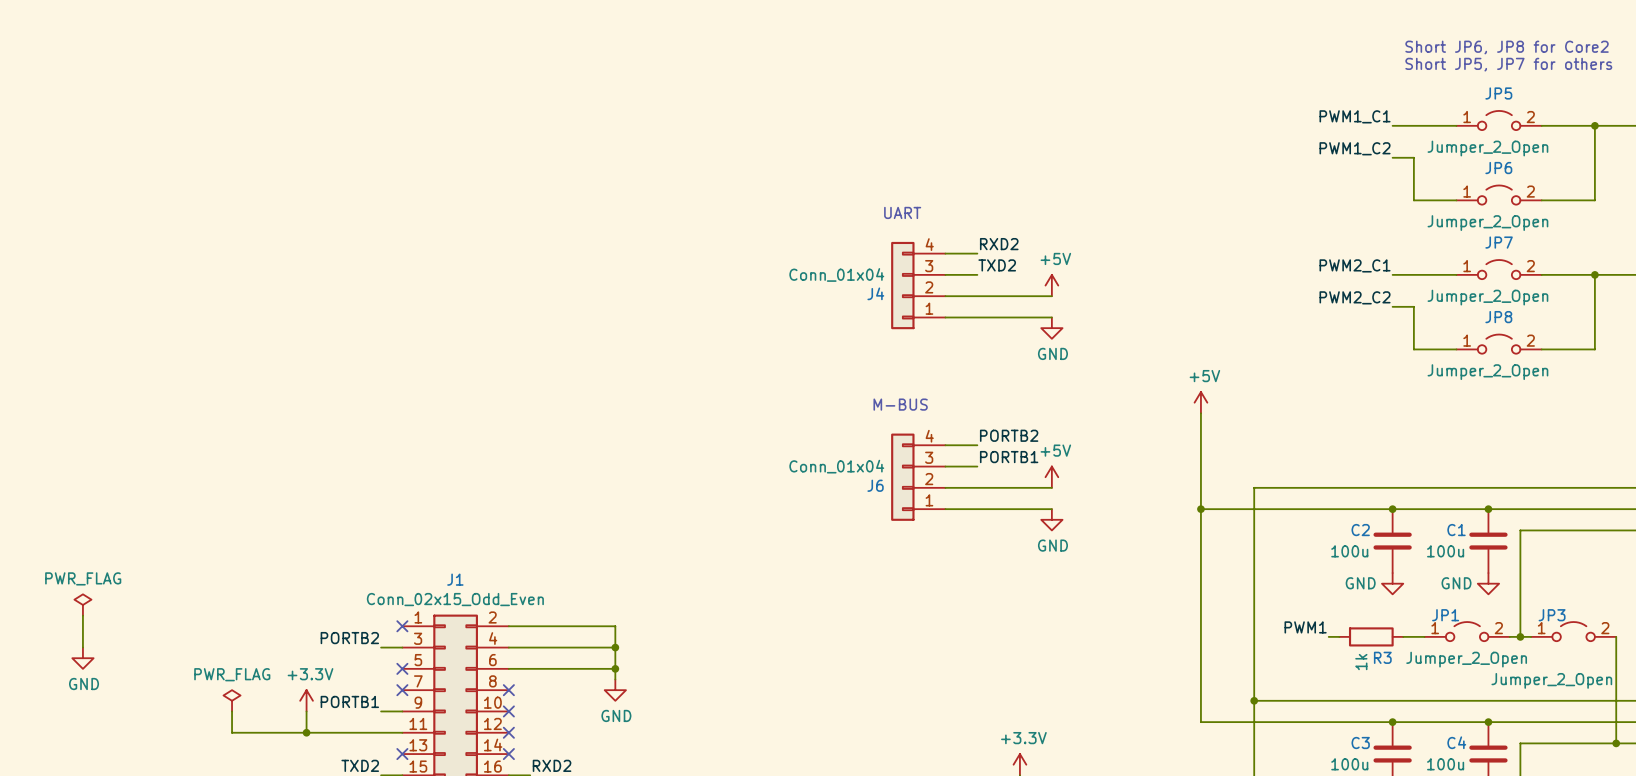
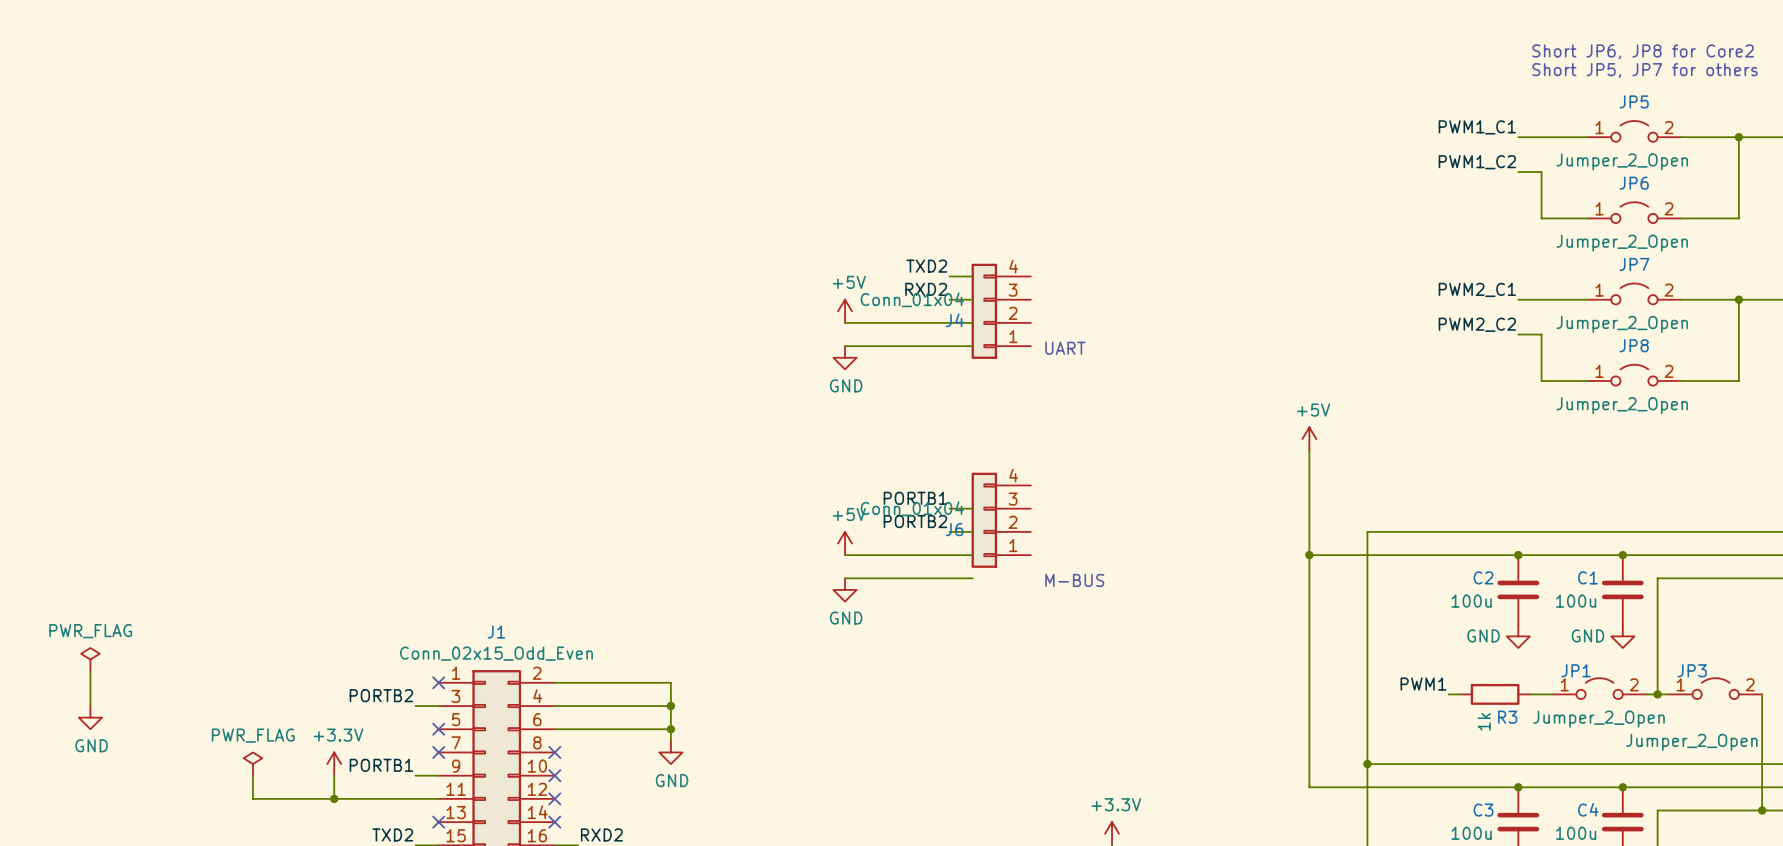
text position: UART (902, 212) -> UART (1065, 348)
label position: RXD2 (999, 244) -> RXD2 (926, 289)
wire: none -> (949, 276) (972, 276)
wire: (945, 253) (977, 253) -> none
label position: TXD2 (997, 265) -> TXD2 (926, 266)
wire: none -> (949, 299) (972, 299)
wire: (945, 274) (977, 274) -> none
power symbol: none -> +5V (845, 311)
power symbol: +5V (1051, 285) -> none
wire: none -> (845, 322) (972, 322)
wire: (945, 296) (1051, 296) -> none
wire: none -> (845, 346) (972, 346)
wire: (945, 317) (1051, 317) -> none
power symbol: none -> GND (845, 357)
power symbol: GND (1051, 328) -> none
text position: M-BUS (900, 404) -> M-BUS (1074, 580)
label position: PORTB2 (1009, 435) -> PORTB2 (915, 521)
wire: (945, 445) (977, 445) -> none
label position: PORTB1 (1009, 457) -> PORTB1 (915, 498)
wire: none -> (949, 508) (972, 508)
wire: (945, 466) (977, 466) -> none
power symbol: +5V (1051, 477) -> none
wire: none -> (949, 531) (972, 531)
wire: (945, 487) (1051, 487) -> none
power symbol: none -> +5V (845, 543)
wire: none -> (845, 555) (972, 555)
wire: (945, 509) (1051, 509) -> none
power symbol: GND (1051, 519) -> none
wire: none -> (845, 578) (972, 578)
power symbol: none -> GND (845, 589)

